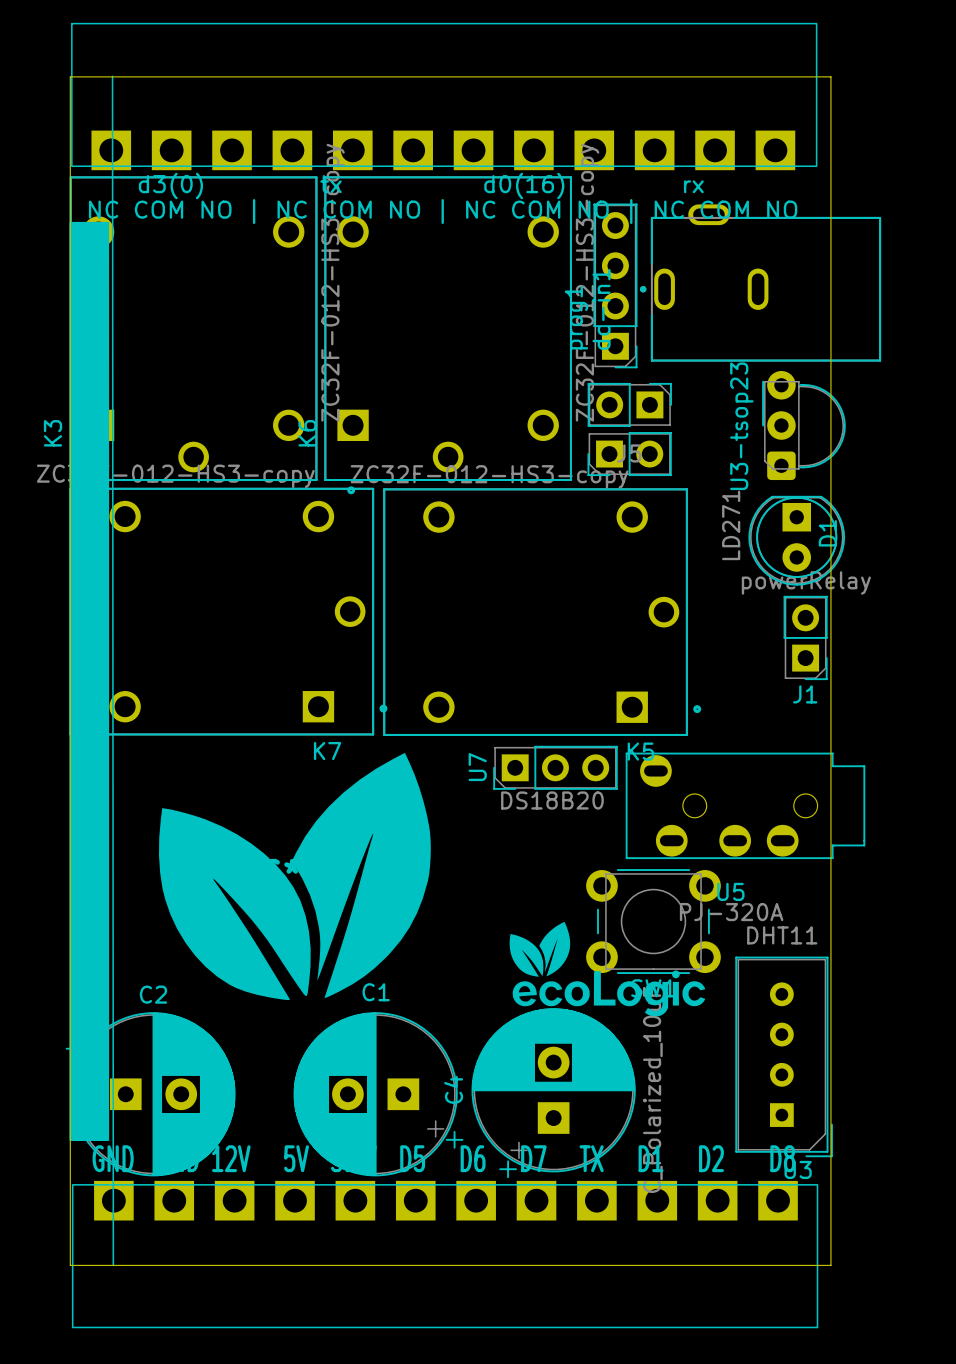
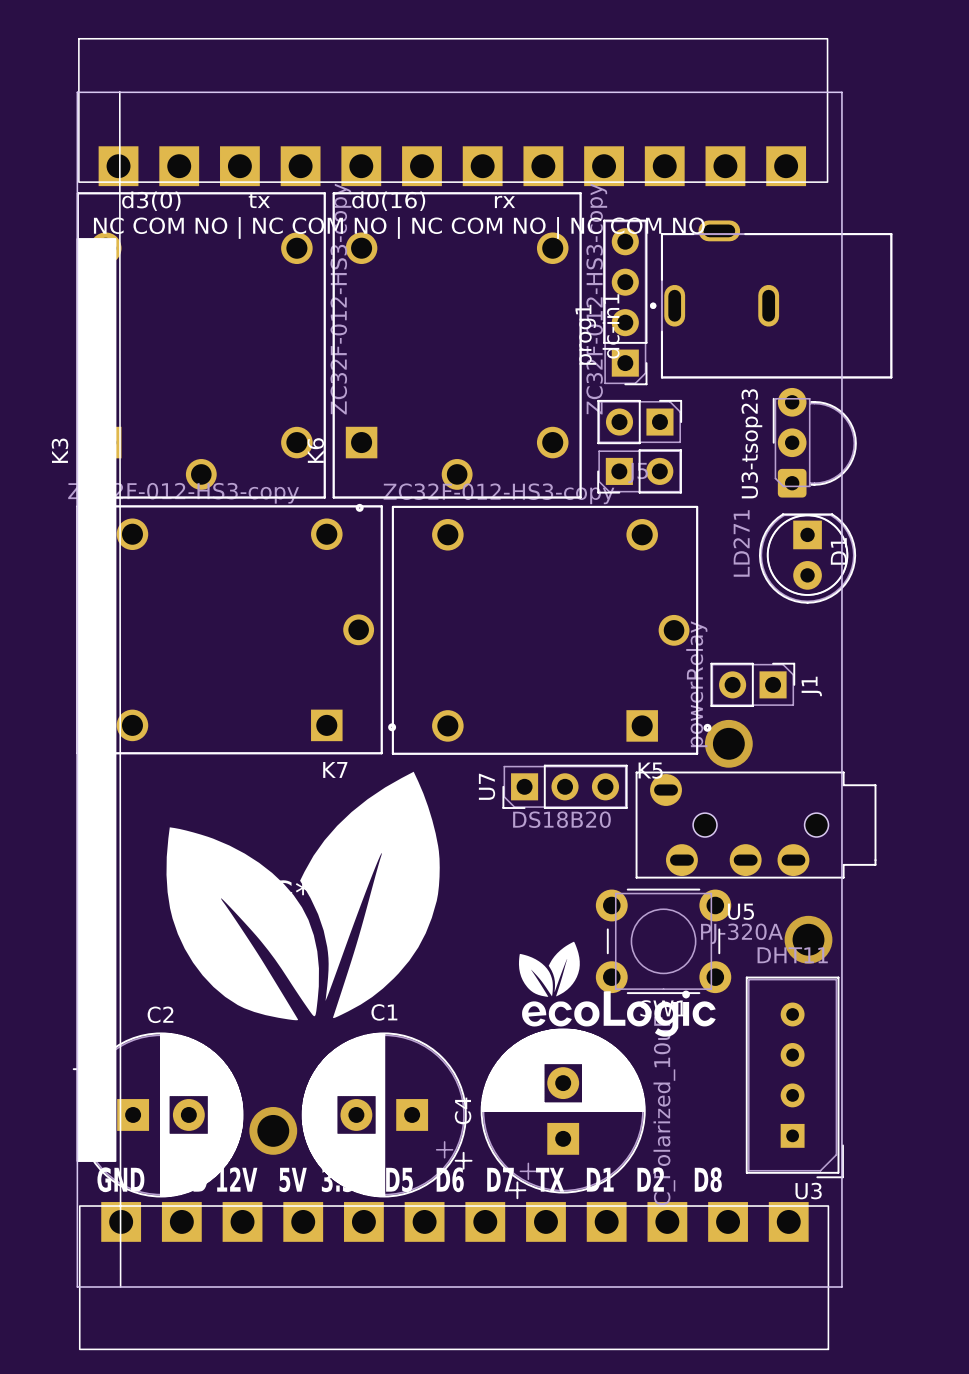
J1 rotation: 0° (805, 637) -> 90° counterclockwise (752, 684)
J1 position: (805, 637) -> (752, 684)
via: none -> (728, 743)
via: none -> (808, 939)
via: none -> (273, 1130)

